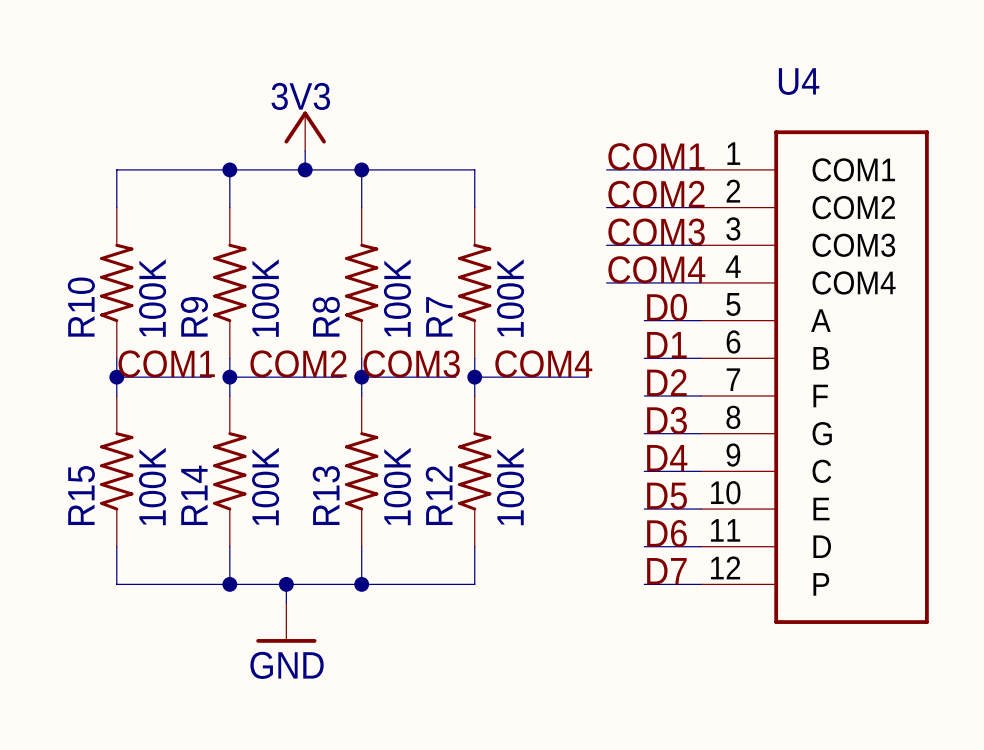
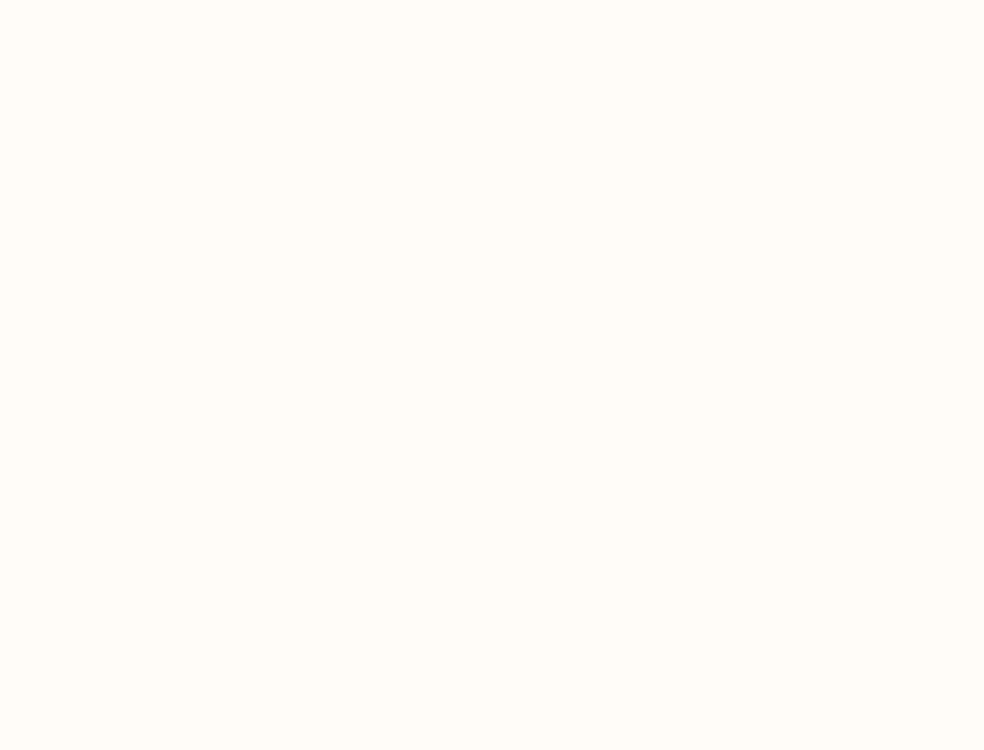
power symbol: 3V3 (305, 131) -> none
wire: (305, 151) (305, 169) -> none
label: COM1 (656, 156) -> none
wire: (229, 169) (229, 207) -> none
junction: (229, 169) -> none
junction: (305, 169) -> none
wire: (361, 169) (361, 207) -> none
junction: (361, 169) -> none
wire: (606, 169) (700, 169) -> none
label: COM2 (656, 194) -> none
wire: (116, 207) (116, 169) (474, 169) (474, 207) -> none
wire: (606, 207) (700, 207) -> none
label: COM3 (656, 232) -> none
wire: (606, 245) (700, 245) -> none
label: COM4 (656, 269) -> none
R10: 100K (116, 282) -> none
R9: 100K (229, 282) -> none
R8: 100K (361, 282) -> none
R7: 100K (474, 282) -> none
wire: (606, 282) (700, 282) -> none
label: D0 (667, 307) -> none
wire: (644, 320) (700, 320) -> none
label: D1 (666, 345) -> none
wire: (116, 358) (116, 395) -> none
wire: (229, 358) (229, 395) -> none
wire: (361, 358) (361, 395) -> none
wire: (474, 358) (474, 395) -> none
wire: (644, 358) (700, 358) -> none
label: COM1 (166, 363) -> none
label: COM2 (298, 363) -> none
label: COM3 (411, 363) -> none
label: COM4 (543, 363) -> none
wire: (116, 377) (210, 377) -> none
junction: (116, 377) -> none
wire: (229, 377) (342, 377) -> none
junction: (229, 377) -> none
wire: (361, 377) (455, 377) -> none
junction: (361, 377) -> none
wire: (474, 377) (587, 377) -> none
junction: (474, 377) -> none
U4: (814, 377) -> none
label: D2 (666, 382) -> none
wire: (644, 395) (700, 395) -> none
label: D3 (667, 420) -> none
wire: (644, 433) (700, 433) -> none
label: D4 (667, 458) -> none
R15: 100K (116, 471) -> none
R14: 100K (229, 471) -> none
R13: 100K (361, 471) -> none
R12: 100K (474, 471) -> none
wire: (644, 471) (700, 471) -> none
label: D5 (667, 496) -> none
wire: (644, 509) (700, 509) -> none
label: D6 (667, 533) -> none
wire: (116, 546) (116, 584) (474, 584) (474, 546) -> none
wire: (229, 546) (229, 584) -> none
wire: (361, 546) (361, 584) -> none
wire: (644, 546) (700, 546) -> none
label: D7 (666, 571) -> none
junction: (229, 584) -> none
wire: (286, 584) (286, 603) -> none
junction: (286, 584) -> none
junction: (361, 584) -> none
wire: (644, 584) (700, 584) -> none
power symbol: GND (286, 623) -> none

